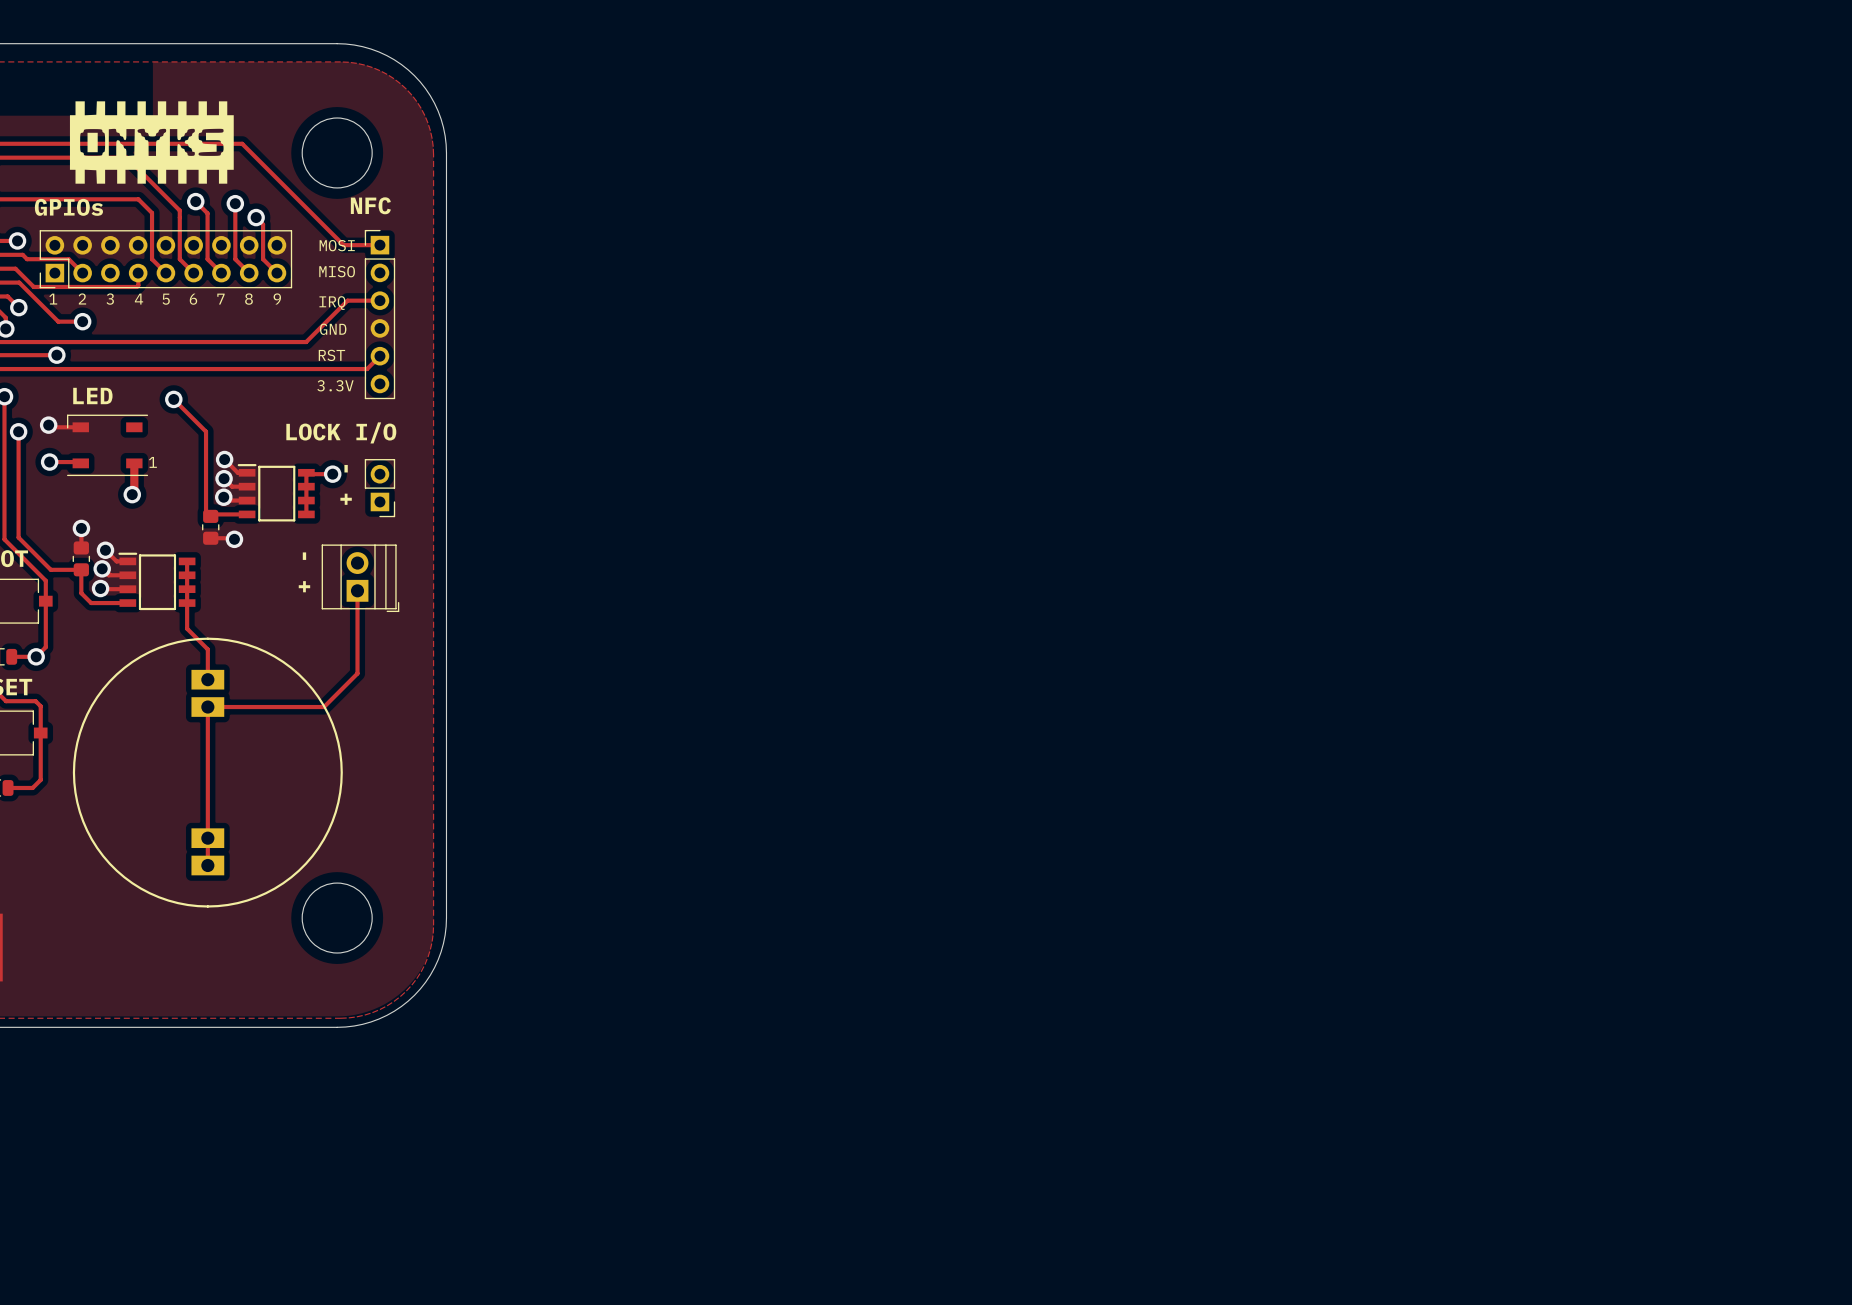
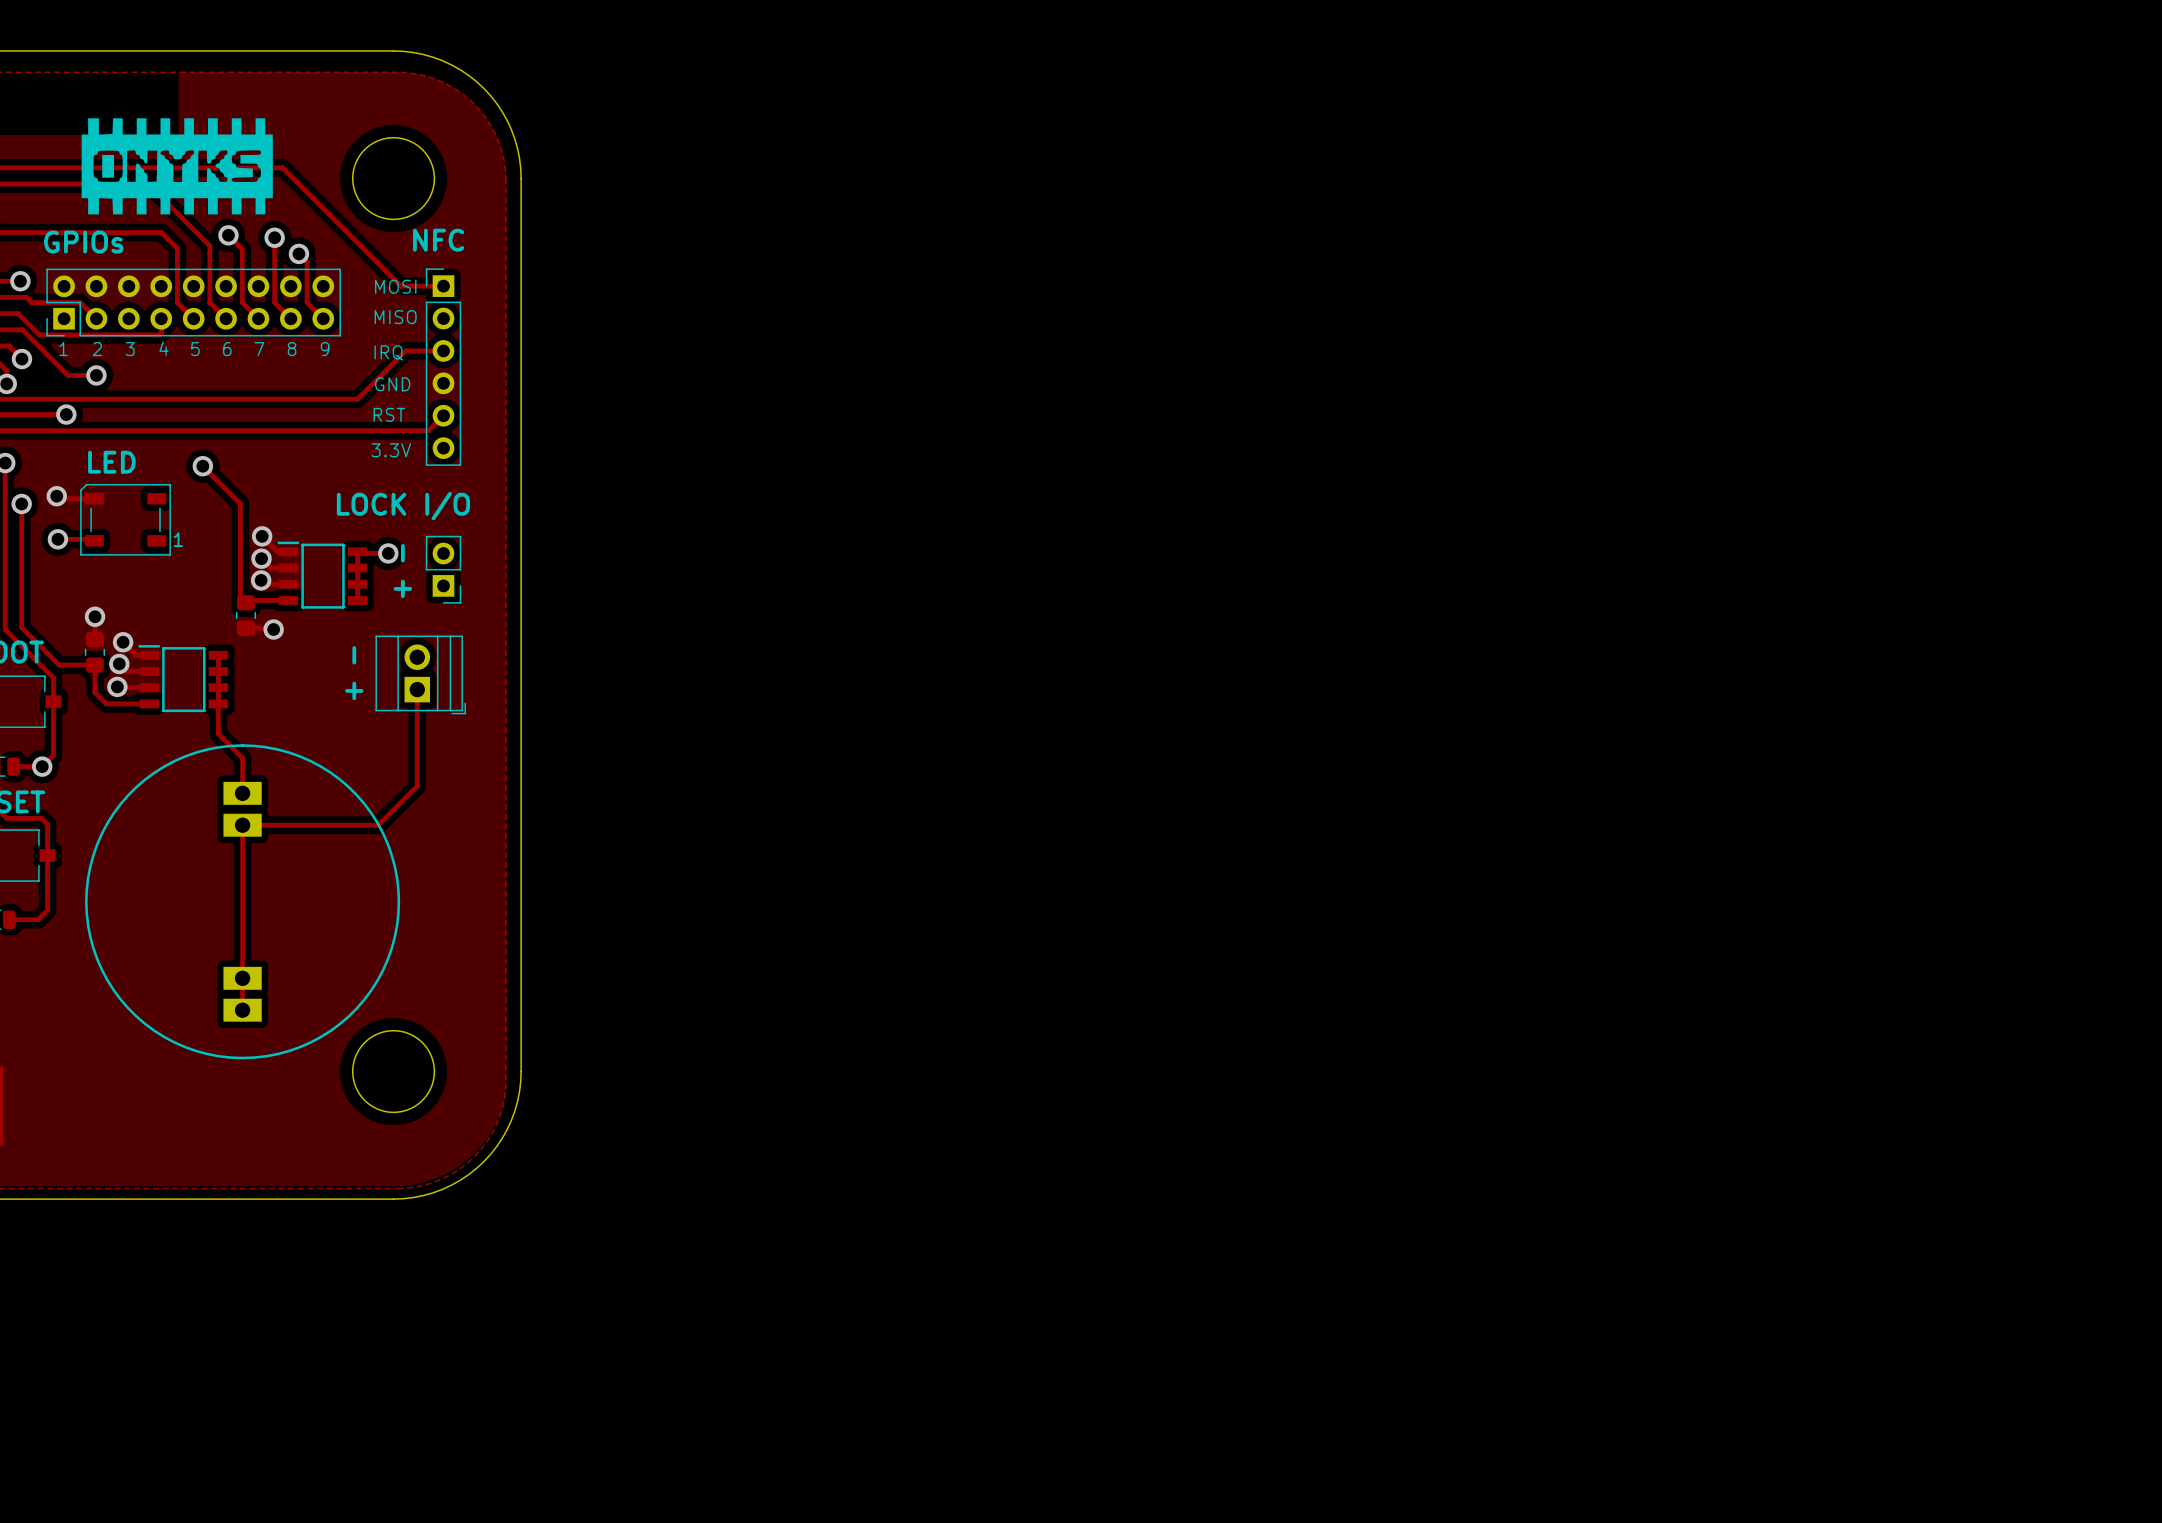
part footprint: [67, 414, 149, 477] -> [80, 483, 171, 556]
track: (134, 463) (134, 492) (132, 494) -> none
via: (132, 494) -> none

